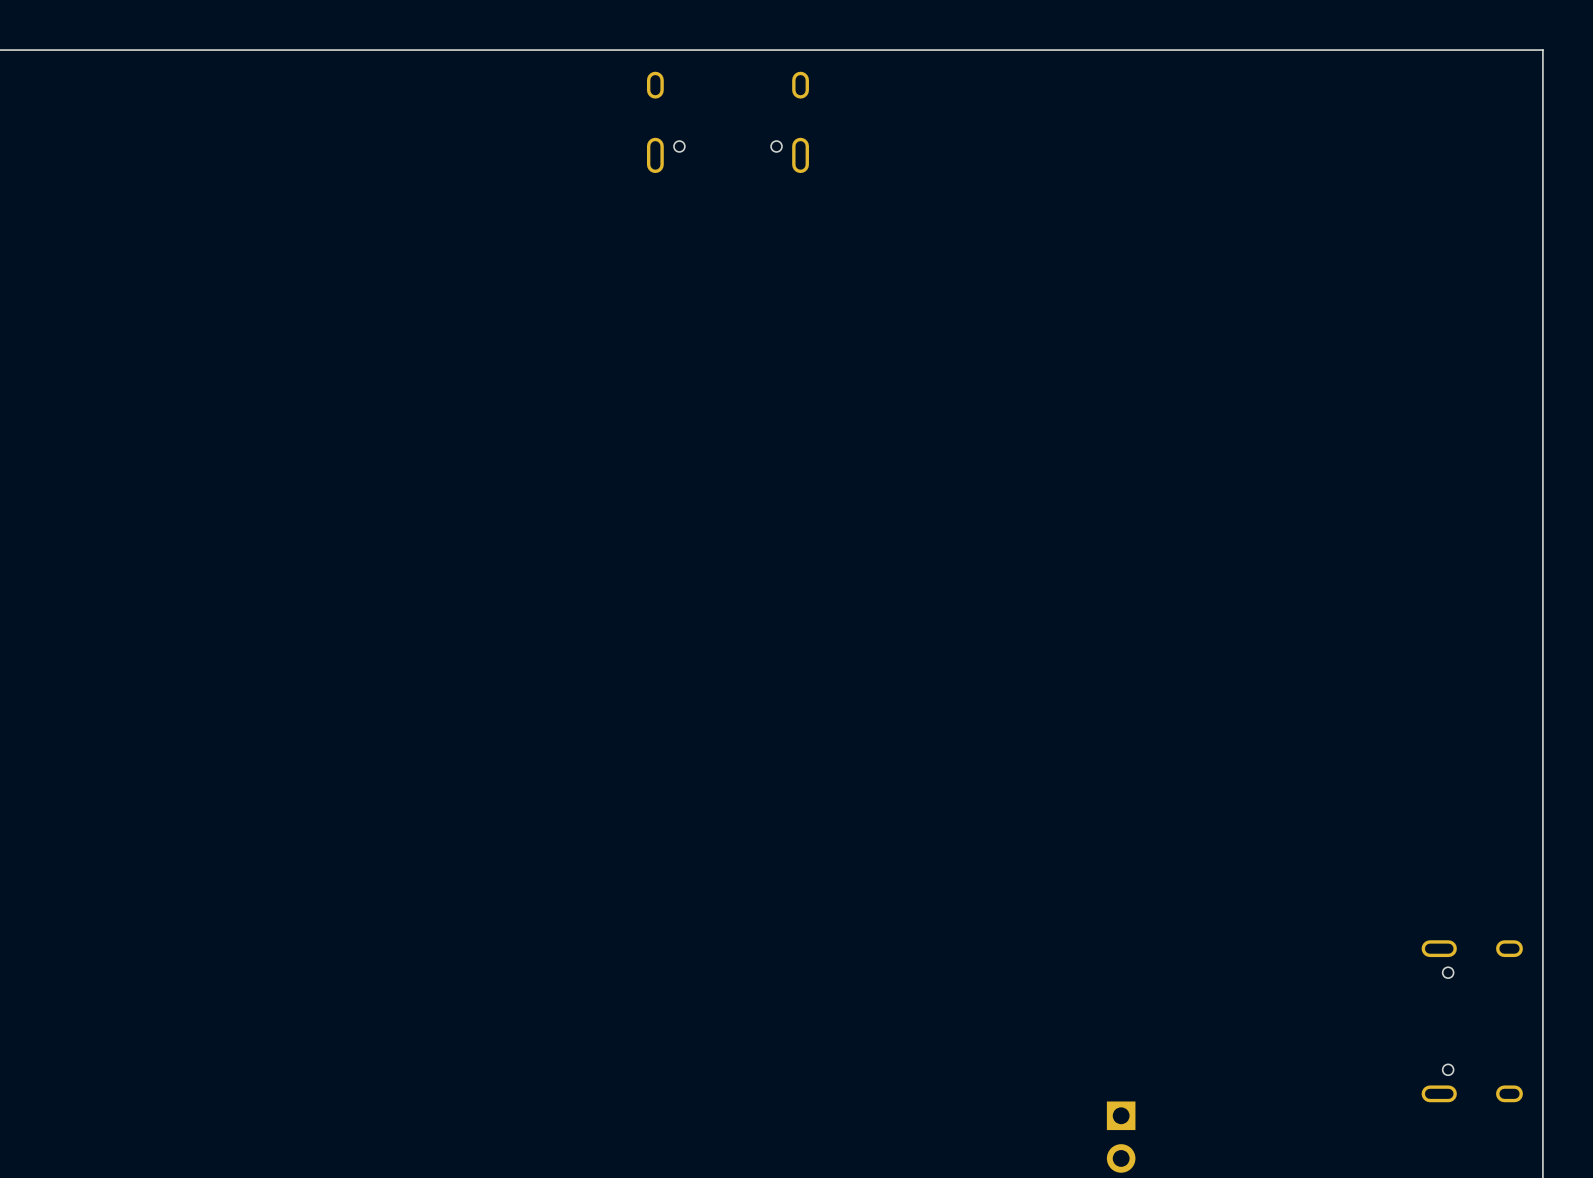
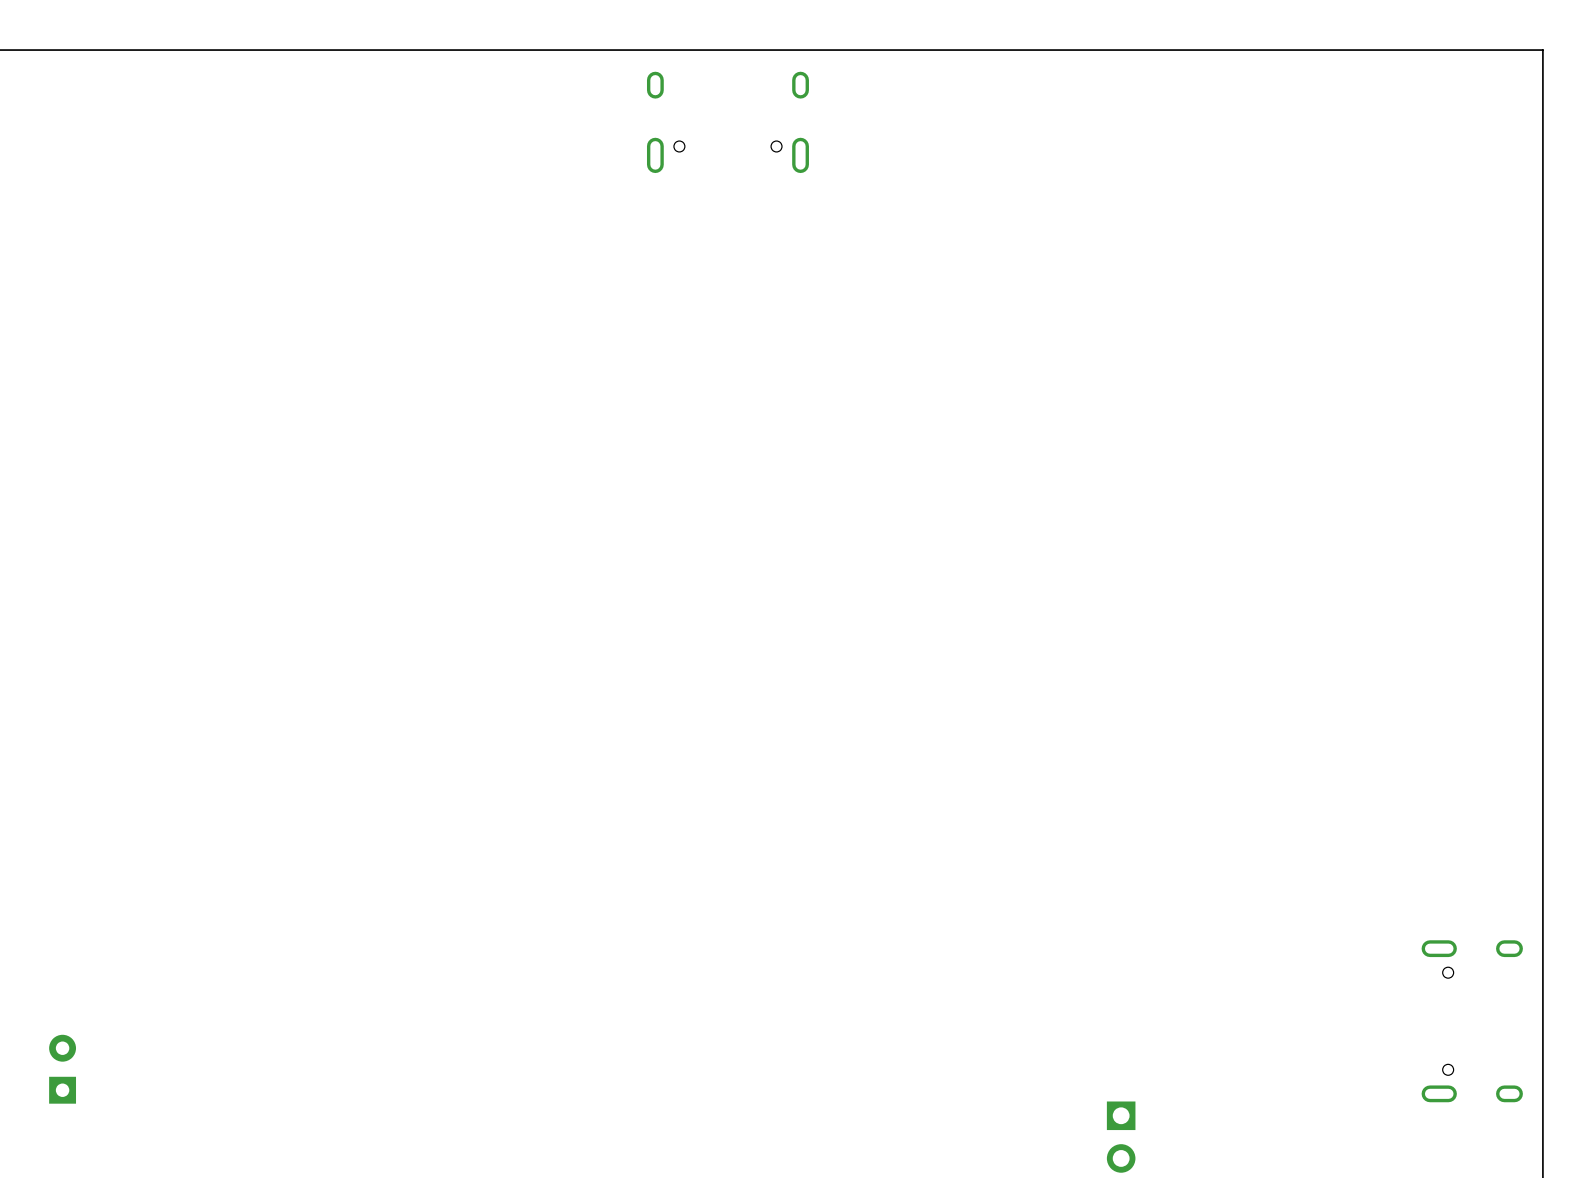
part: none -> (62, 1069)

